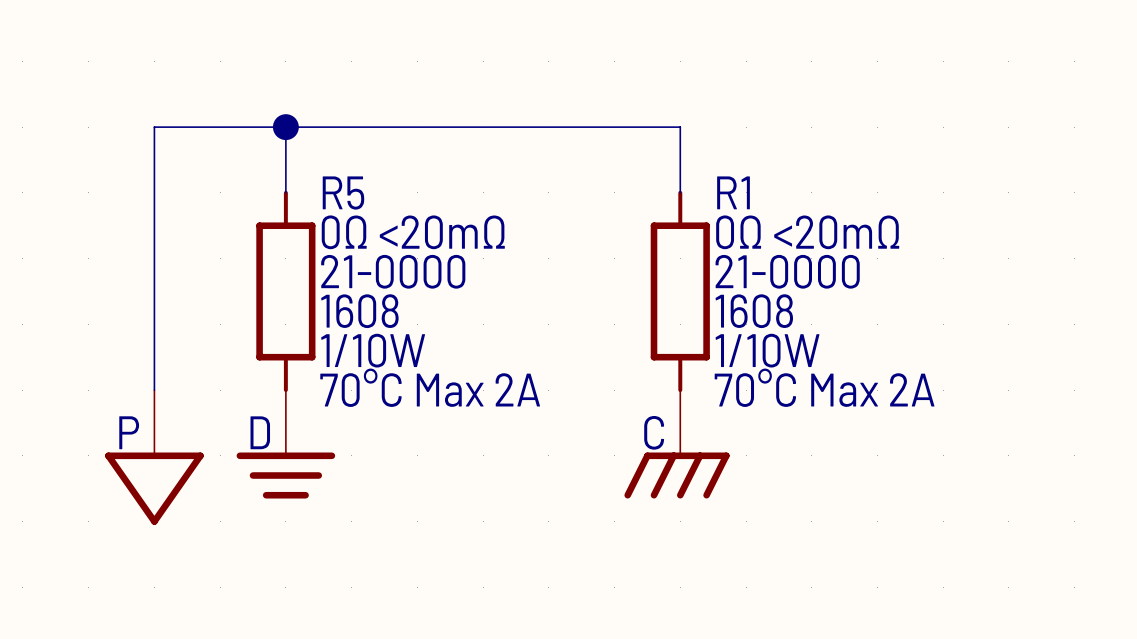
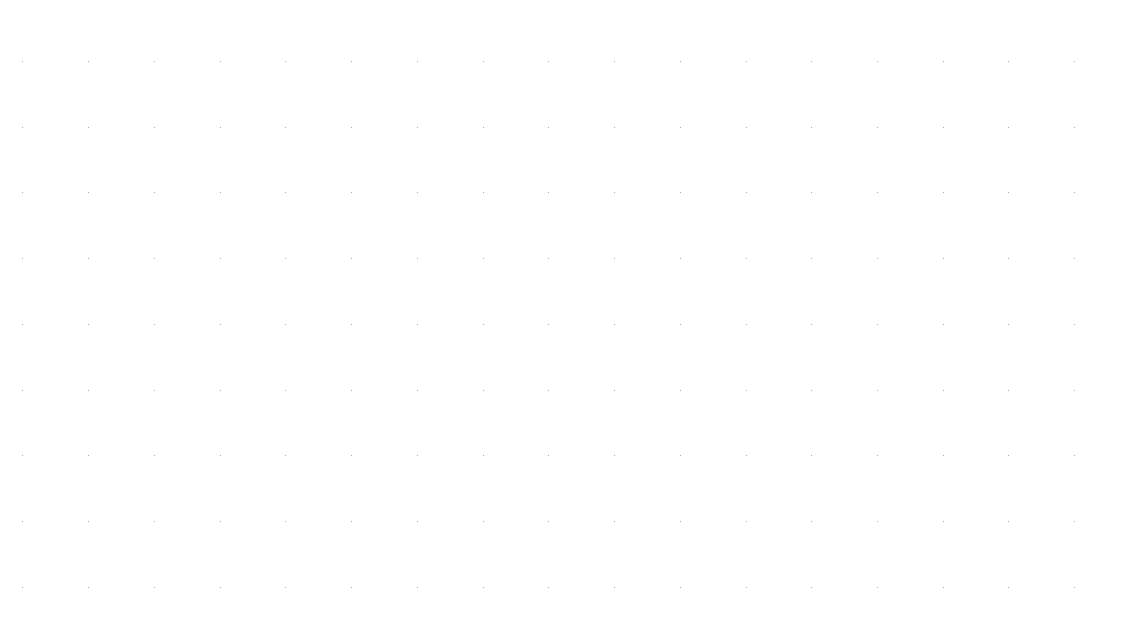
wire: (285, 127) (285, 192) -> none
junction: (285, 127) -> none
wire: (680, 192) (680, 127) (154, 127) (154, 390) -> none
R5: 0Ω <20mΩ (285, 291) -> none
R1: 0Ω <20mΩ (680, 291) -> none
power symbol: (285, 444) -> none
power symbol: (677, 444) -> none
power symbol: (154, 457) -> none

